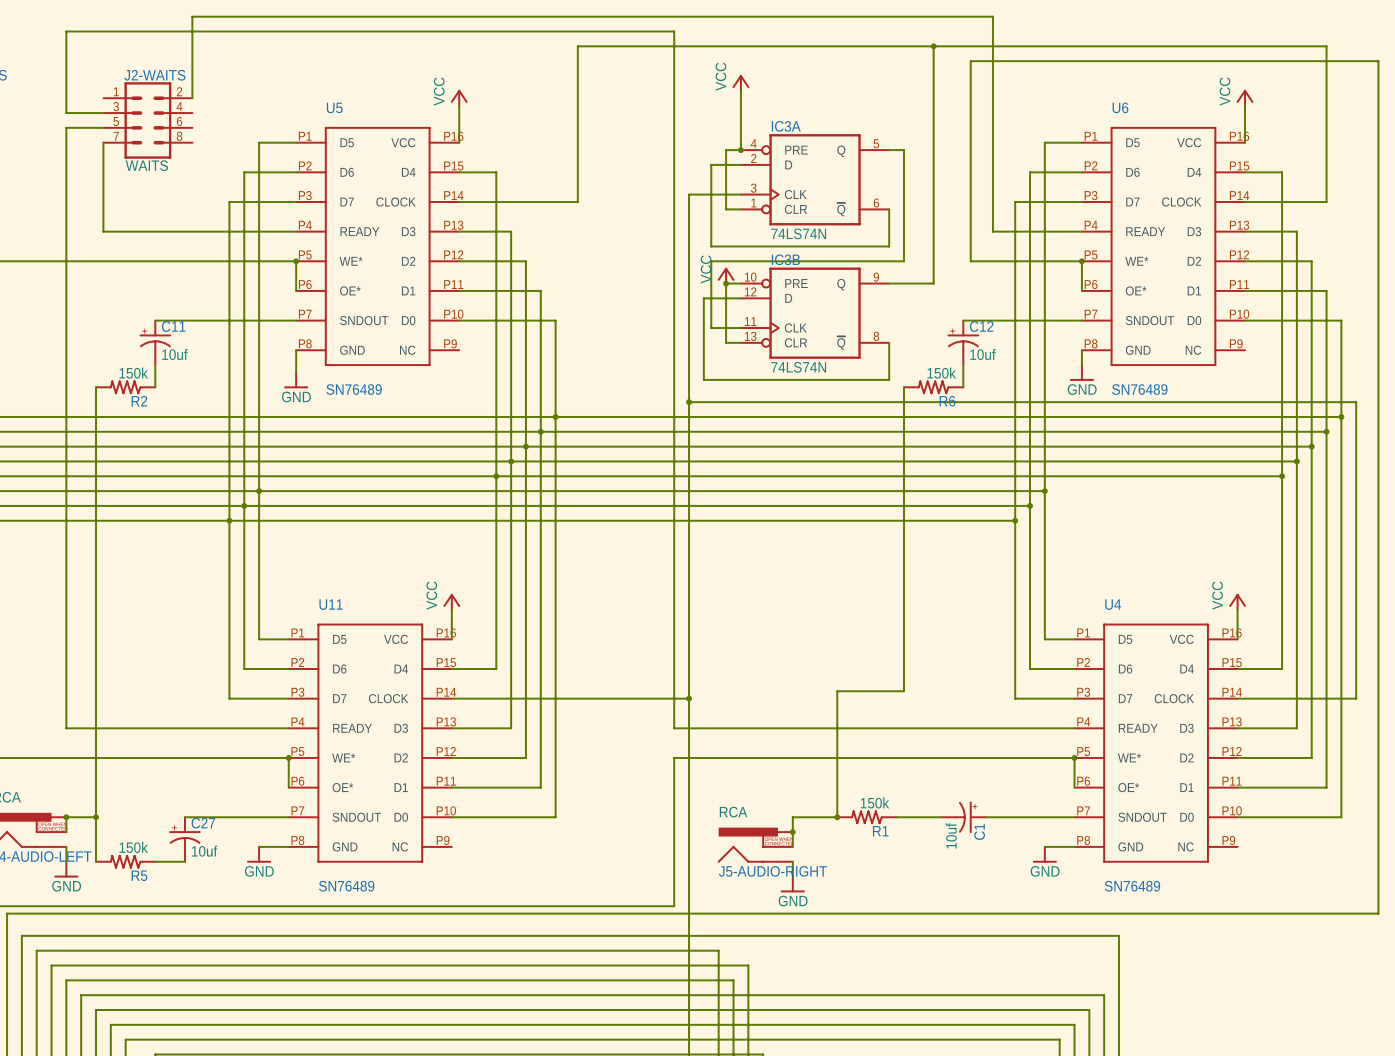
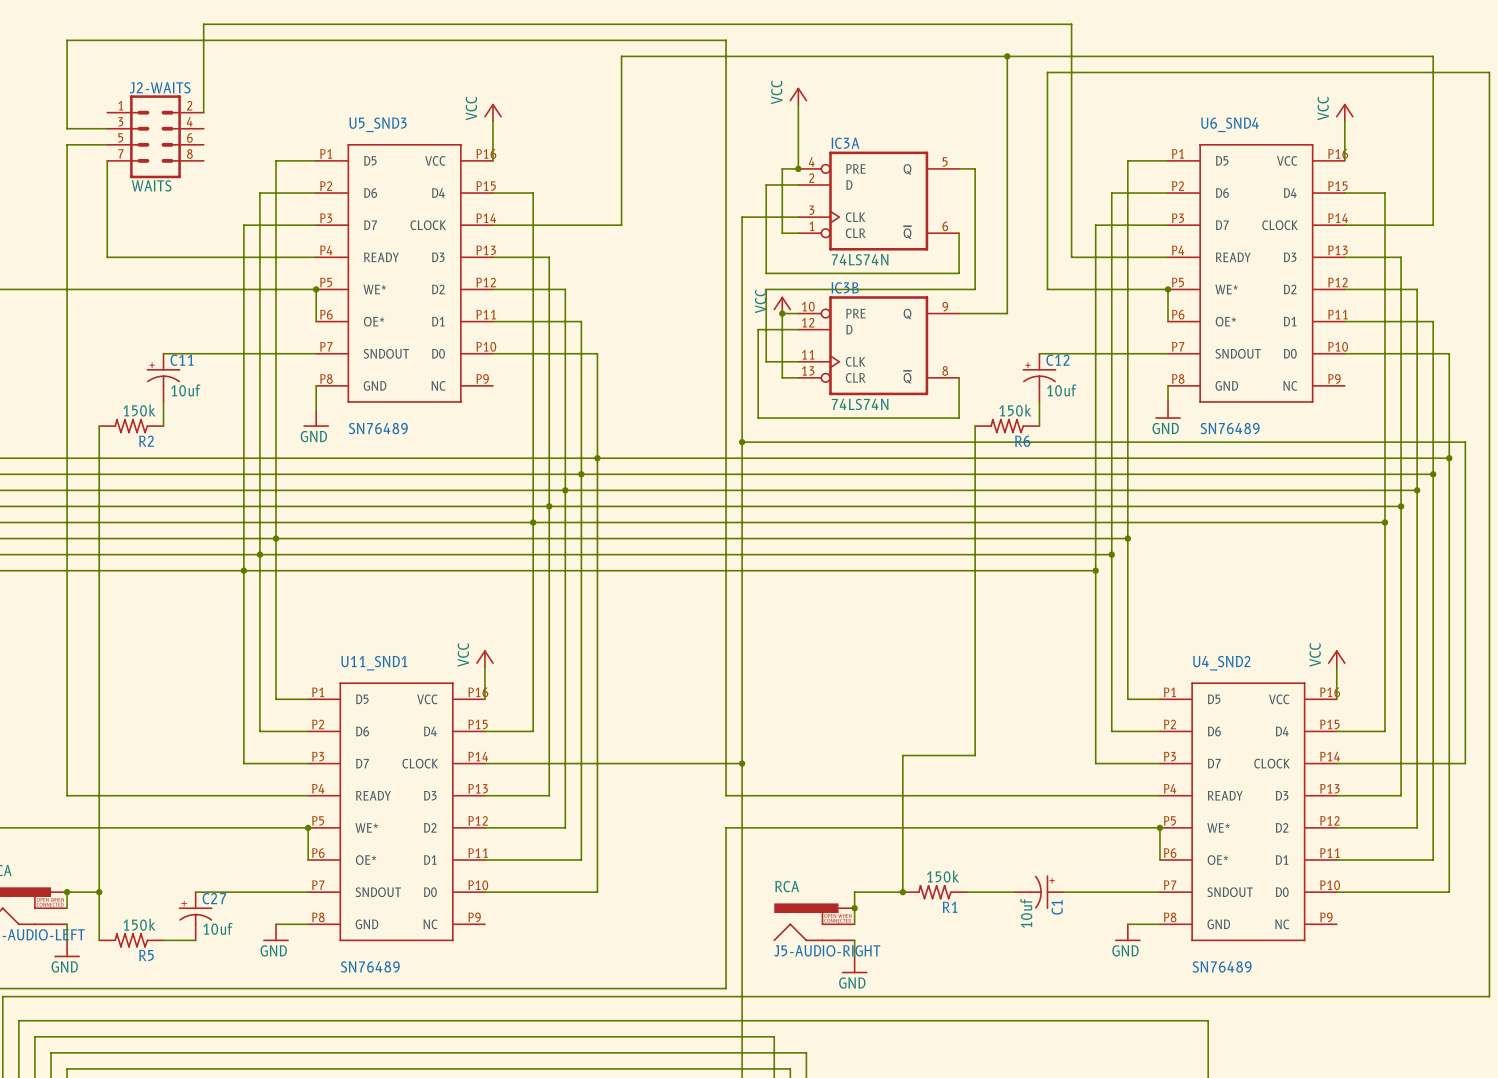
U5 name: U5 (334, 107) -> U5_SND3 (378, 124)
U6 name: U6 (1120, 107) -> U6_SND4 (1229, 124)
U11 name: U11 (331, 604) -> U11_SND1 (374, 663)
U4 name: U4 (1113, 604) -> U4_SND2 (1221, 663)

